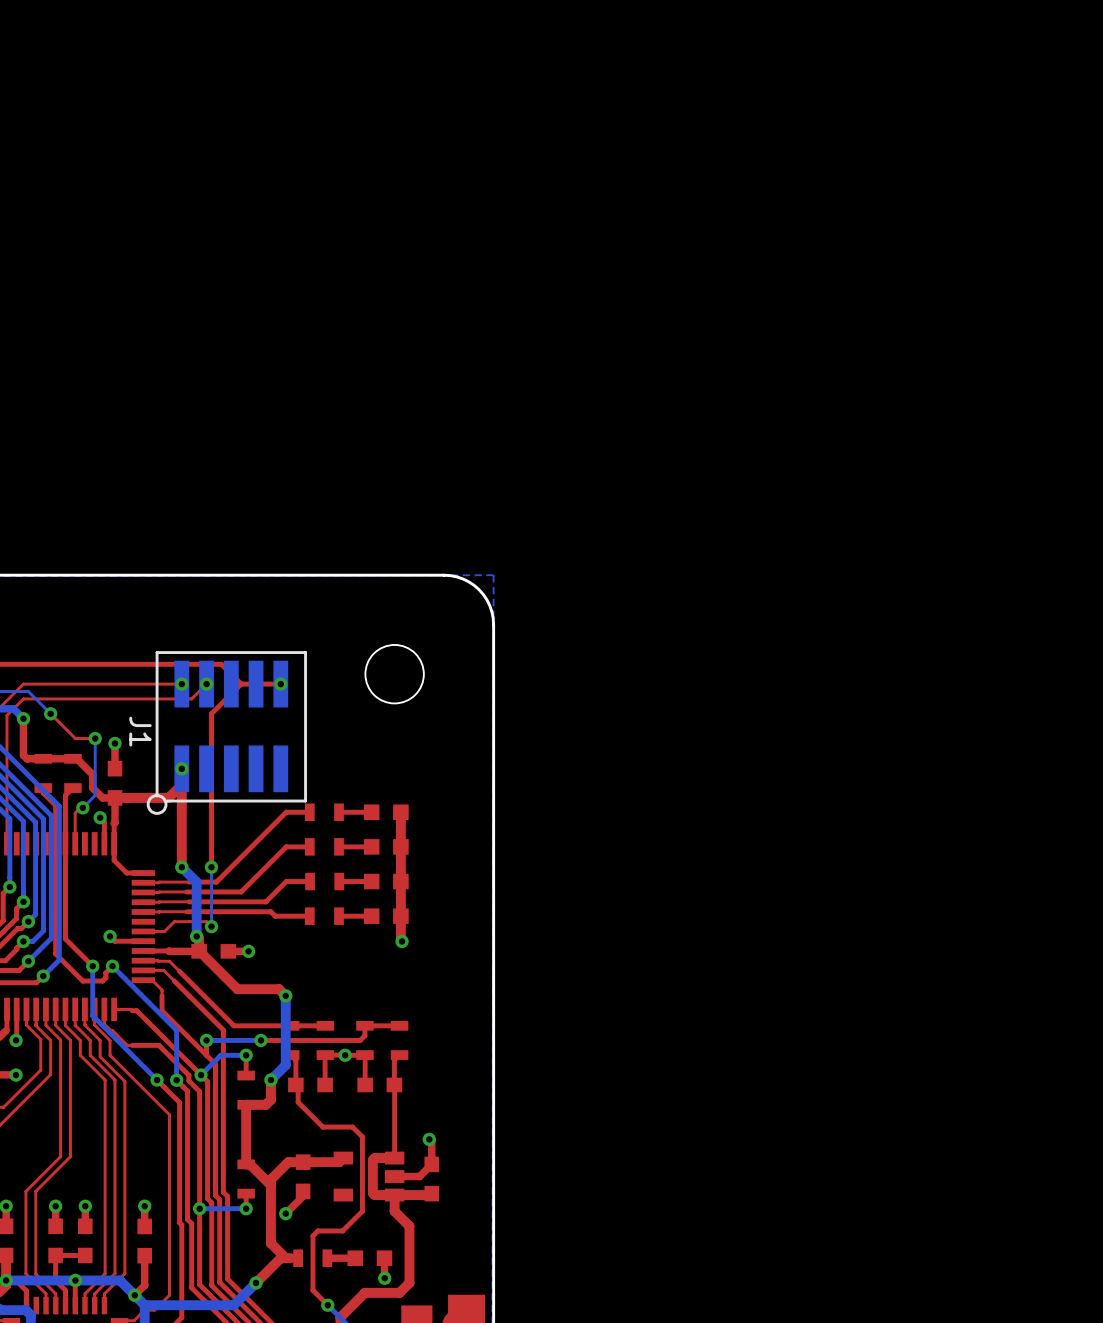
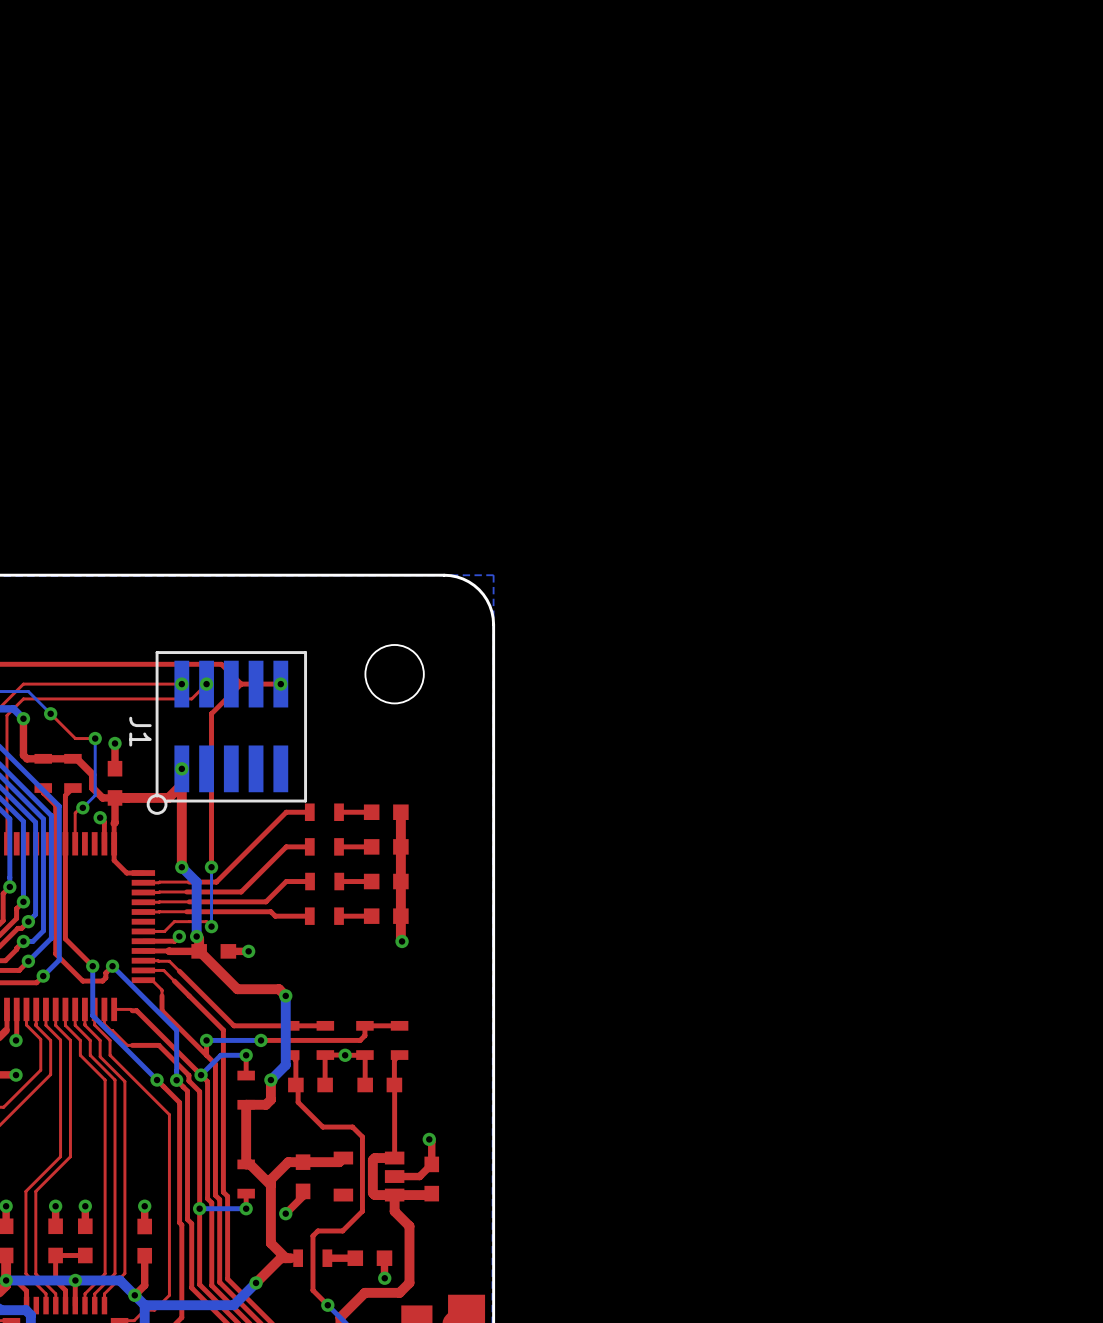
top track: (110, 936) (114, 941) (143, 941) -> (179, 936) (174, 941) (143, 941)
via position: (110, 936) -> (179, 936)

